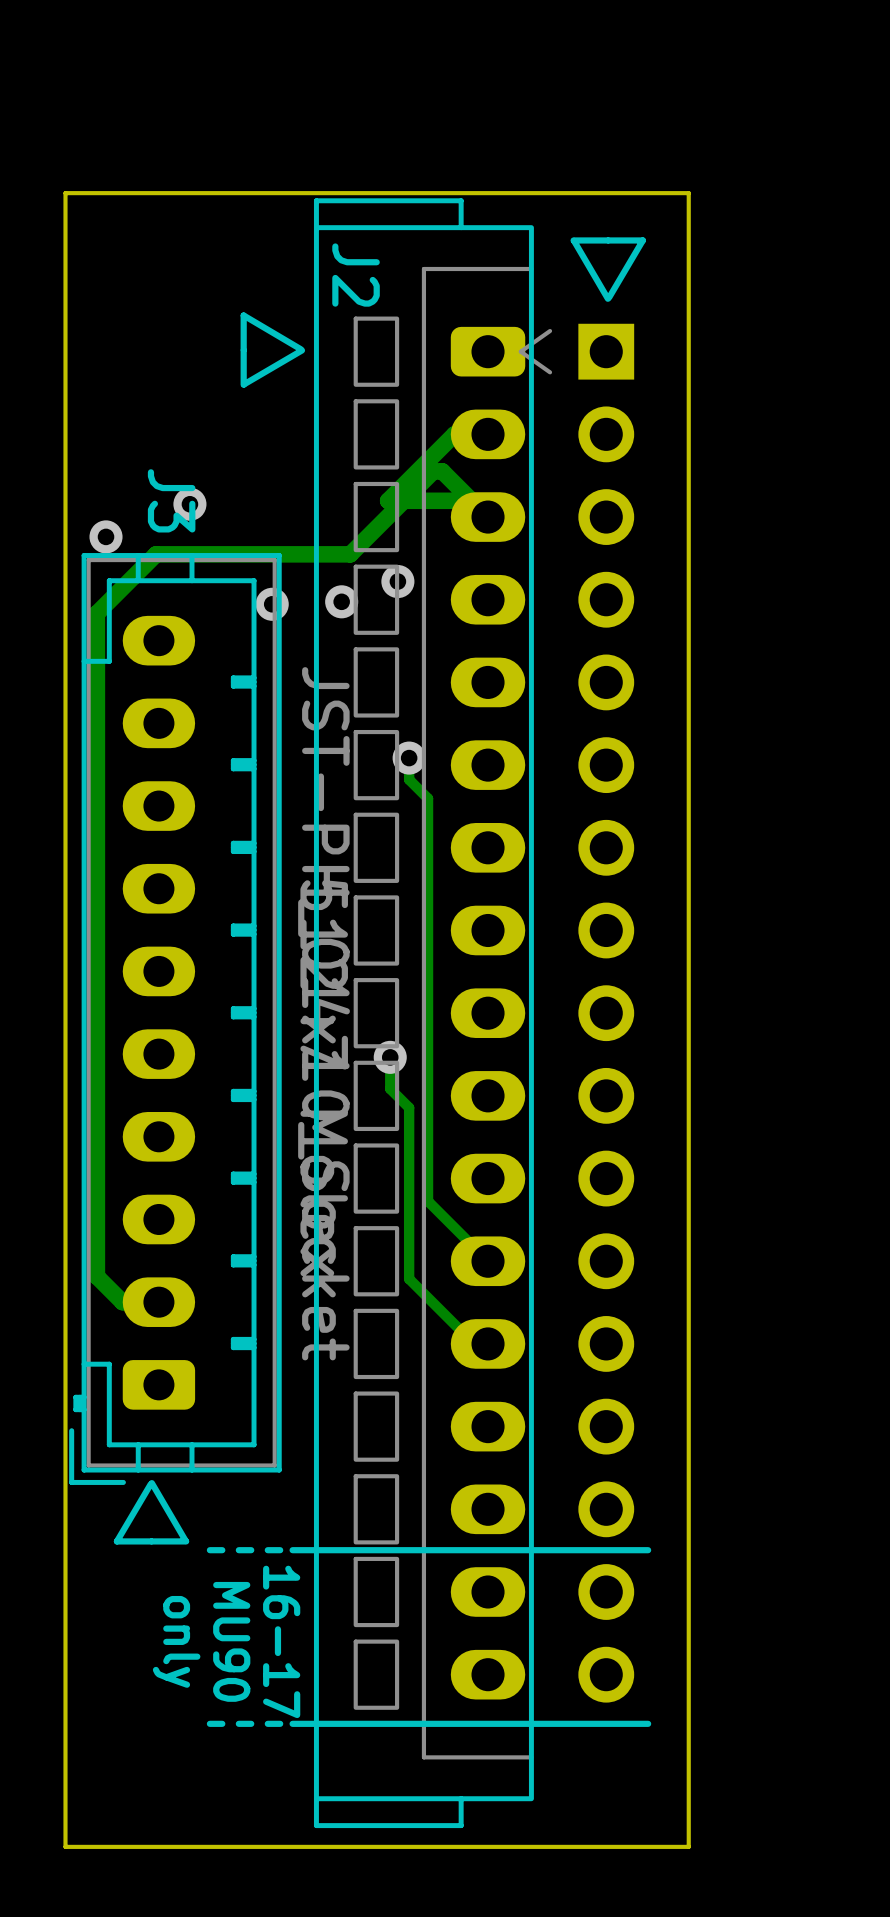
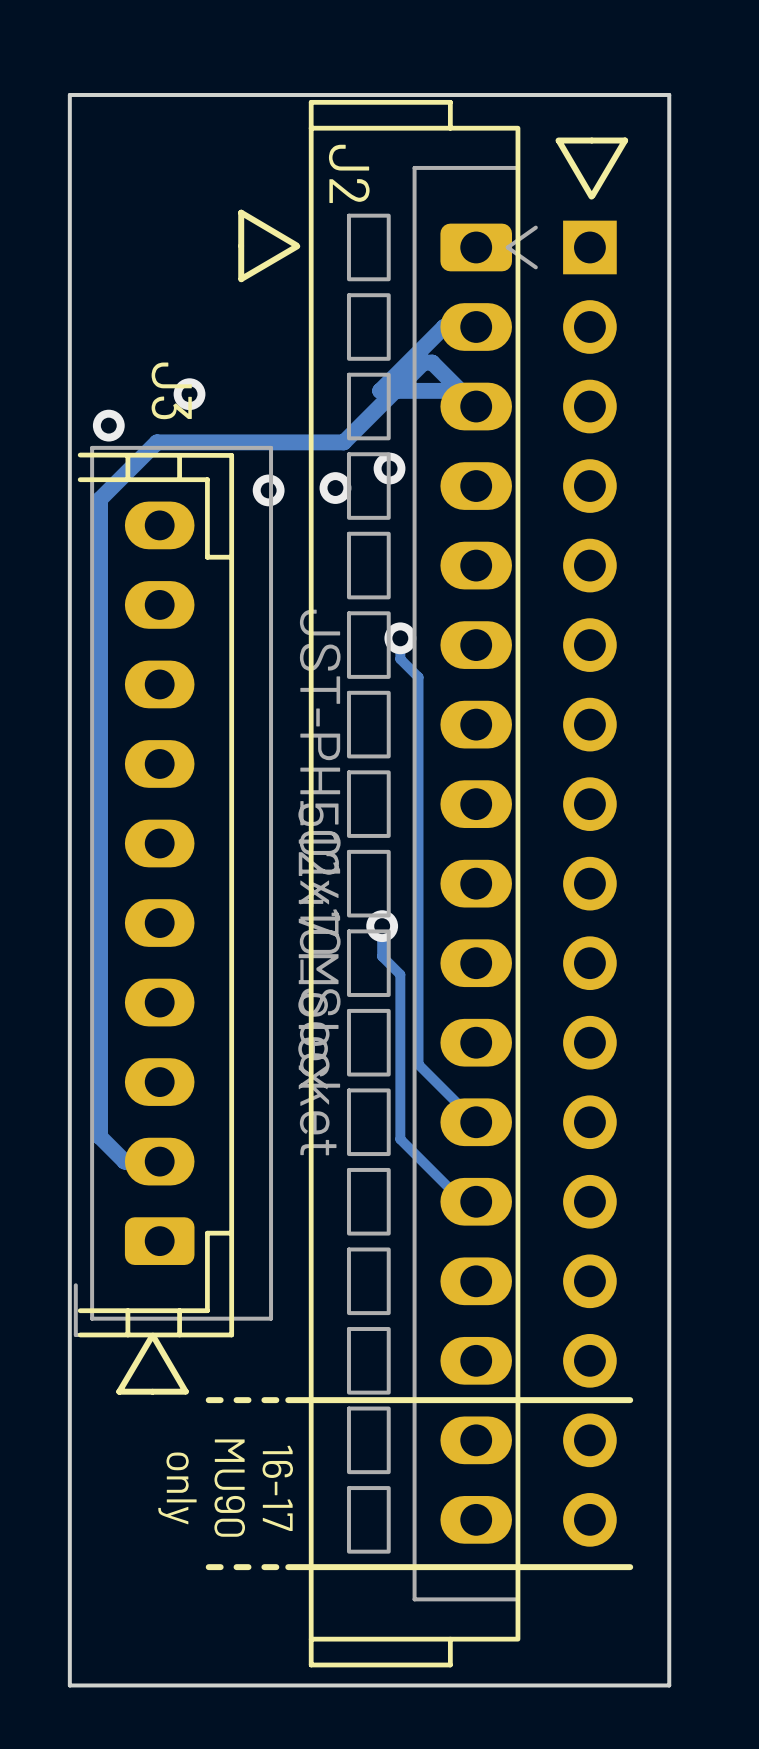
J3 footprint: [69, 553, 282, 1485] -> [73, 445, 274, 1338]

